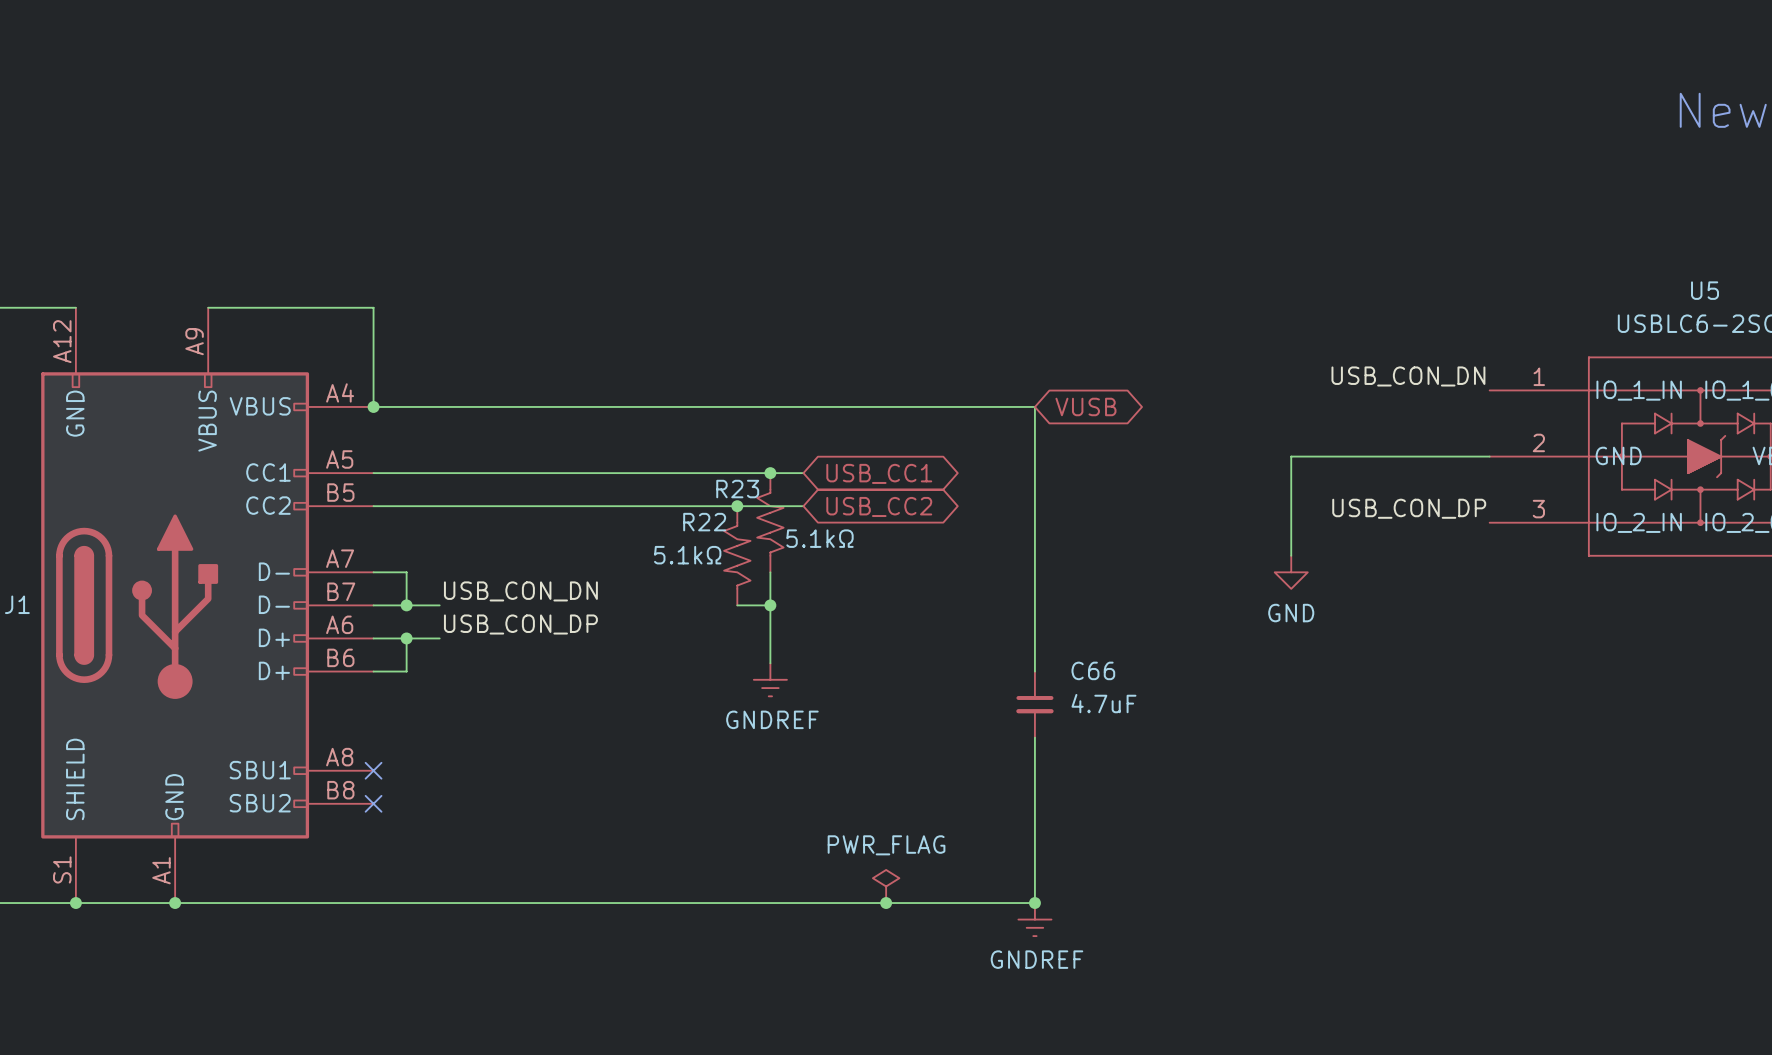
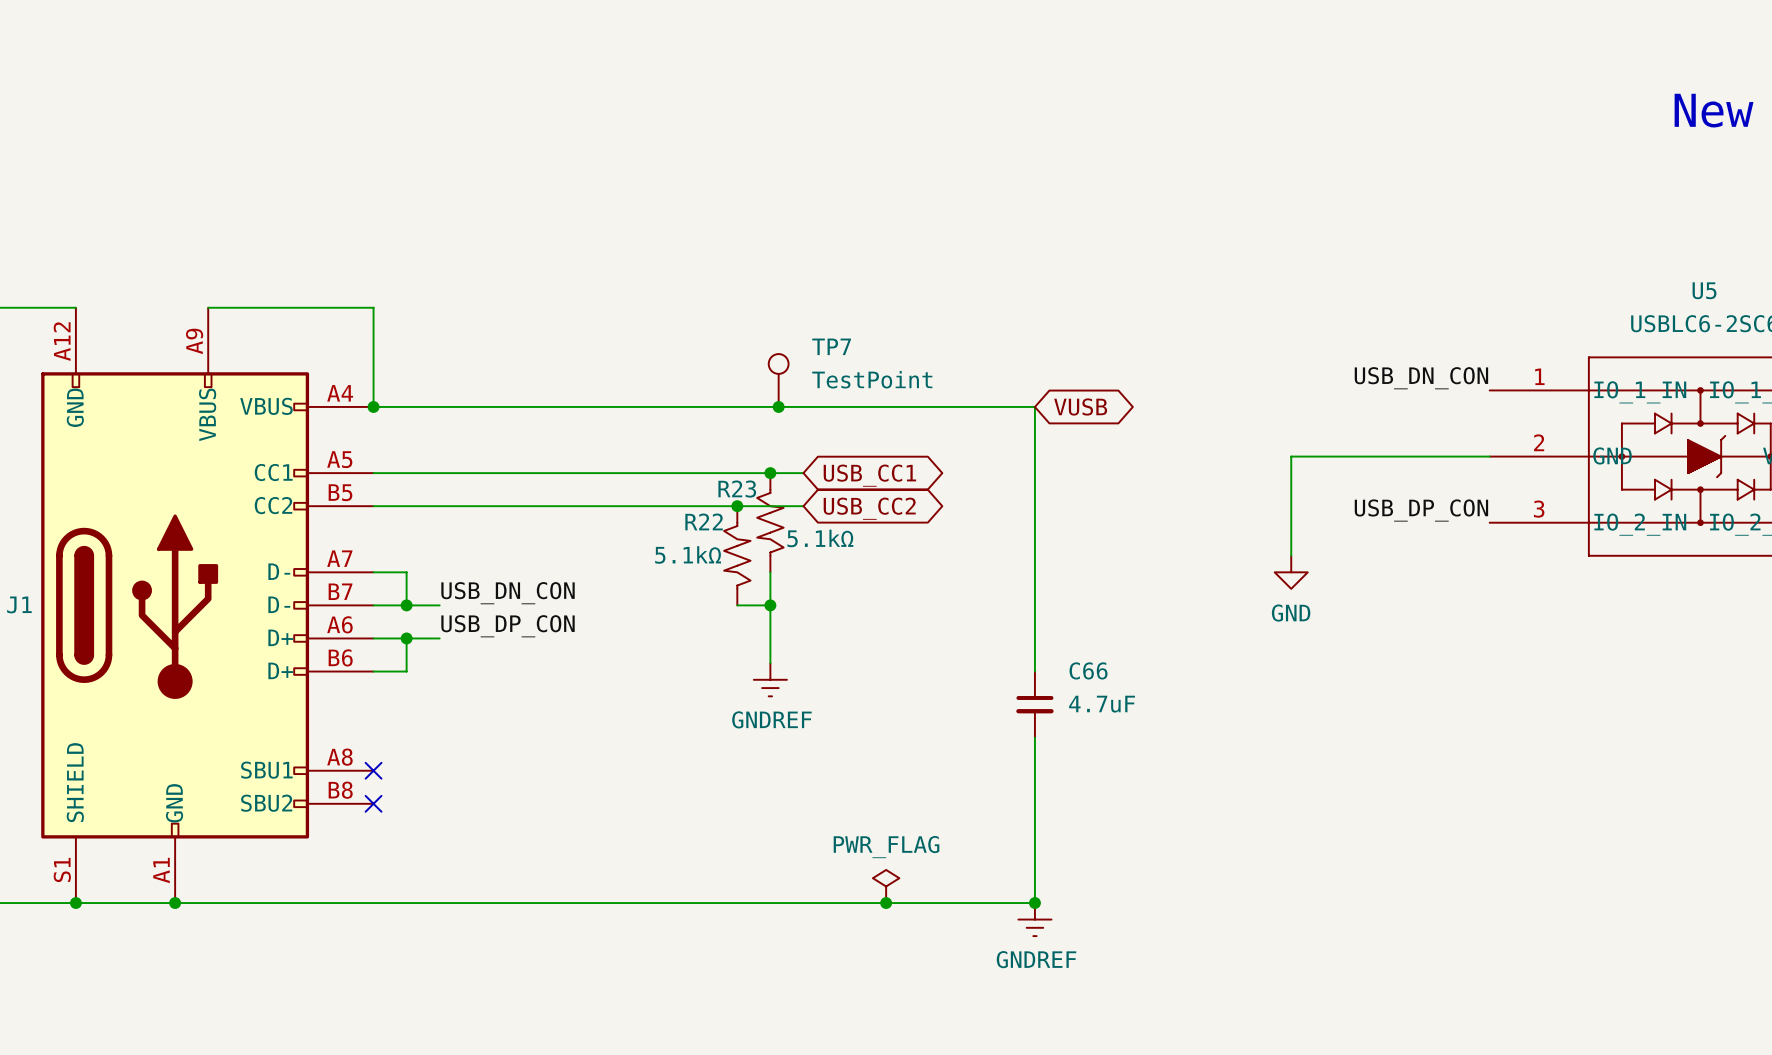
label: USB_CON_DN (1408, 376) -> USB_DN_CON (1421, 378)
TP7: none -> TestPoint (778, 380)
junction: none -> (778, 406)
label: USB_CON_DP (1409, 508) -> USB_DP_CON (1421, 510)
label: USB_CON_DN (520, 591) -> USB_DN_CON (508, 593)
label: USB_CON_DP (520, 624) -> USB_DP_CON (508, 626)

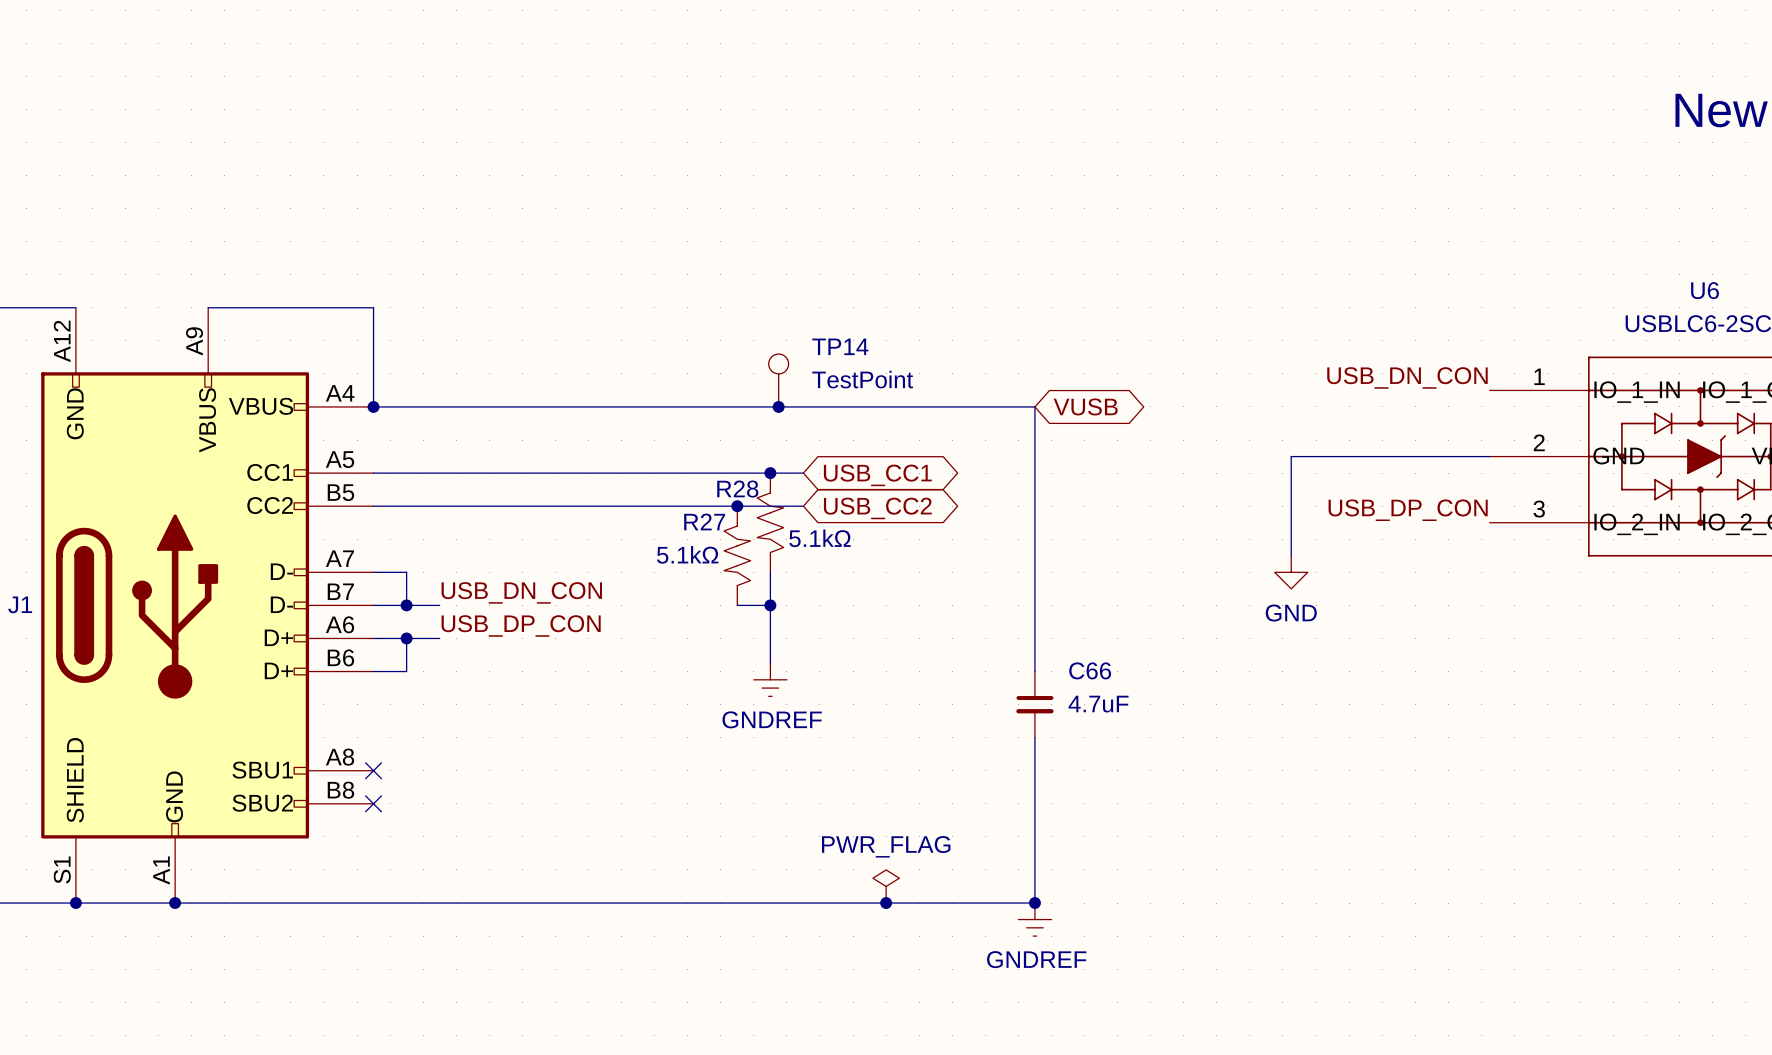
U5 name: U5 (1704, 290) -> U6 (1705, 290)
TP7 name: TP7 (831, 346) -> TP14 (840, 346)
R23 name: R23 (737, 489) -> R28 (737, 489)
R22 name: R22 (704, 521) -> R27 (704, 521)

